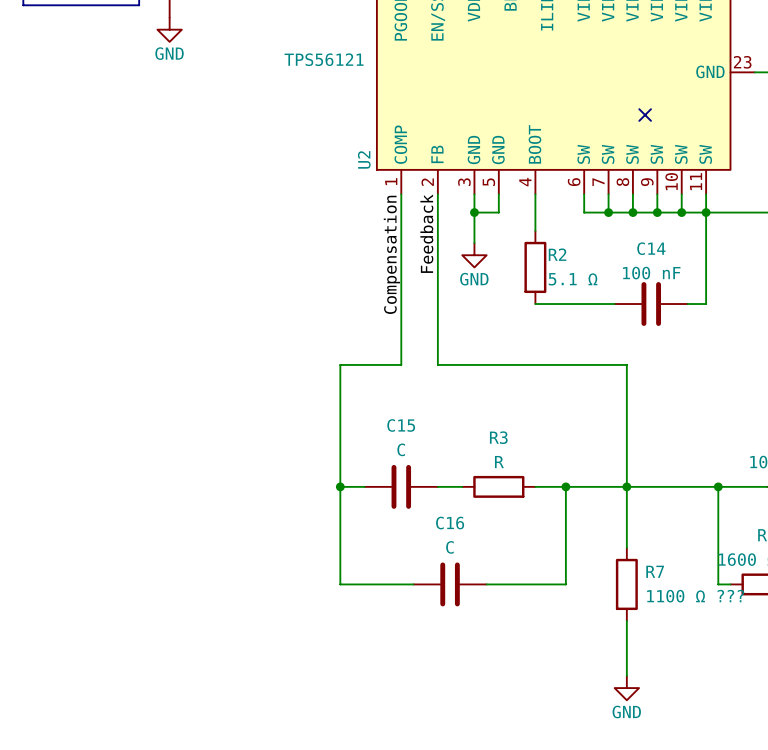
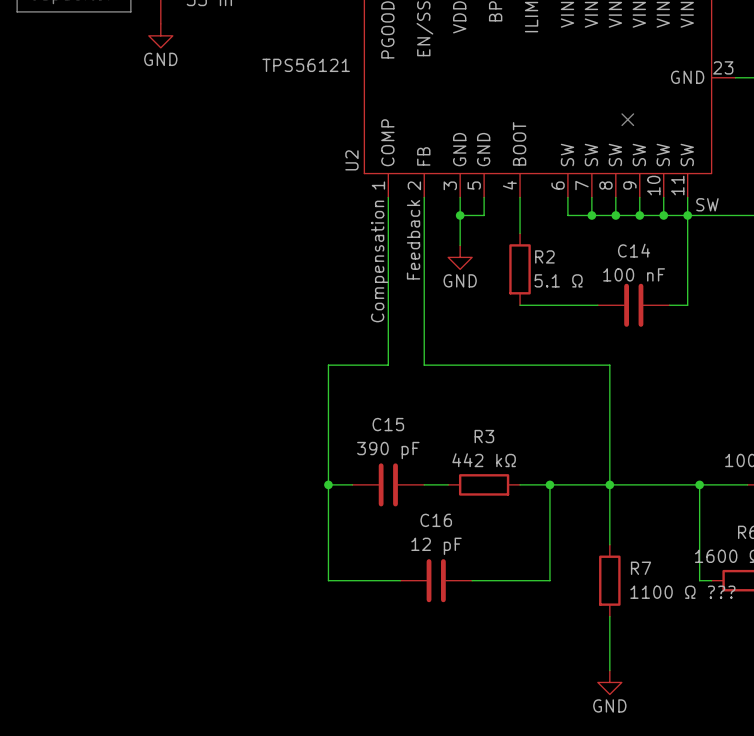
label: none -> SW (707, 204)
C15 value: C (401, 449) -> 390 pF (388, 450)
R3 value: R (499, 462) -> 442 kΩ (484, 460)
C16 value: C (449, 547) -> 12 pF (436, 546)

